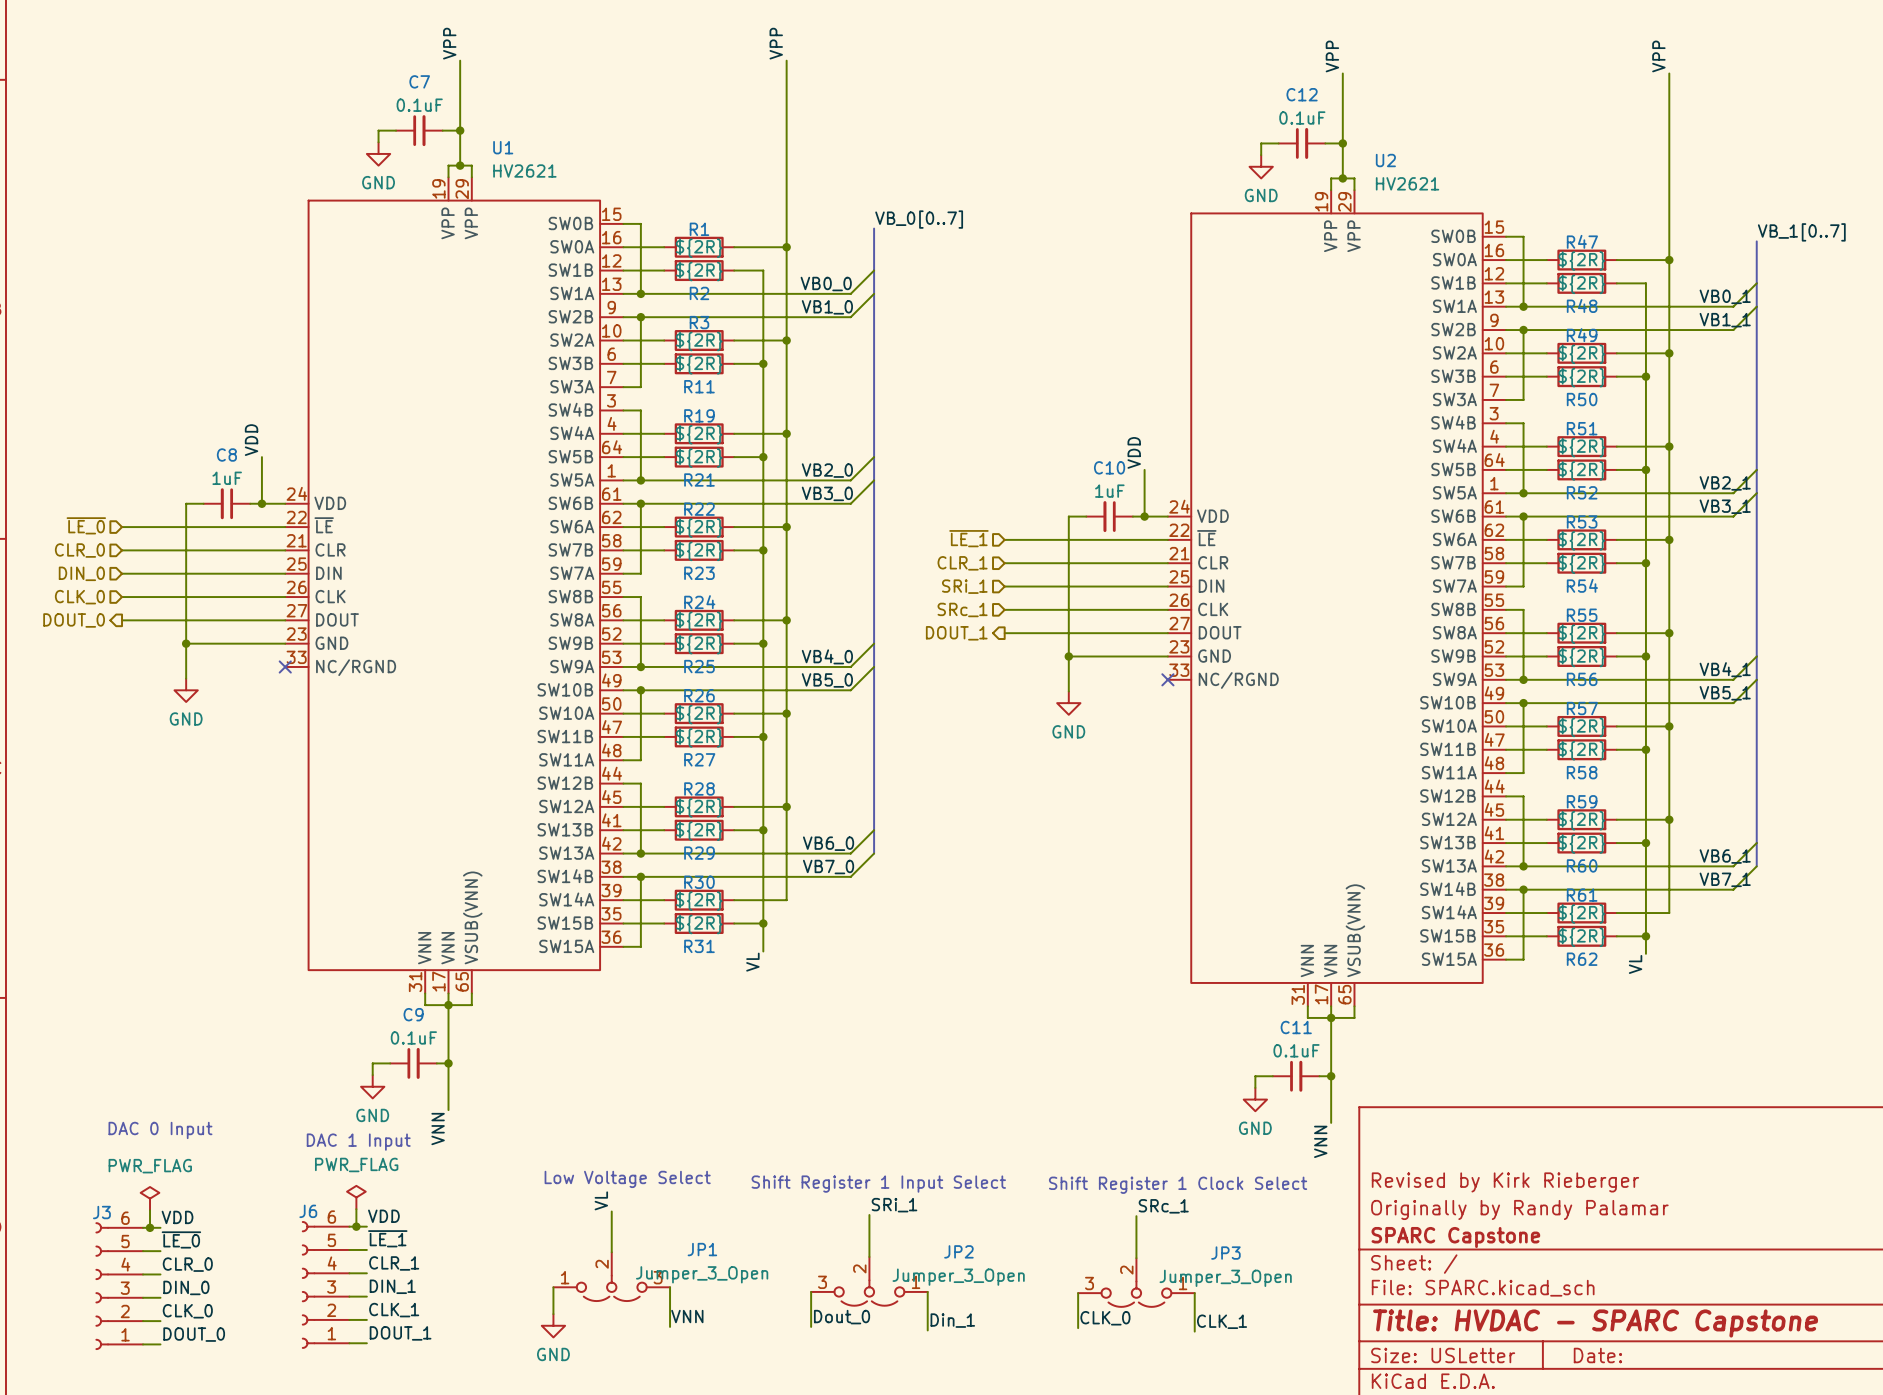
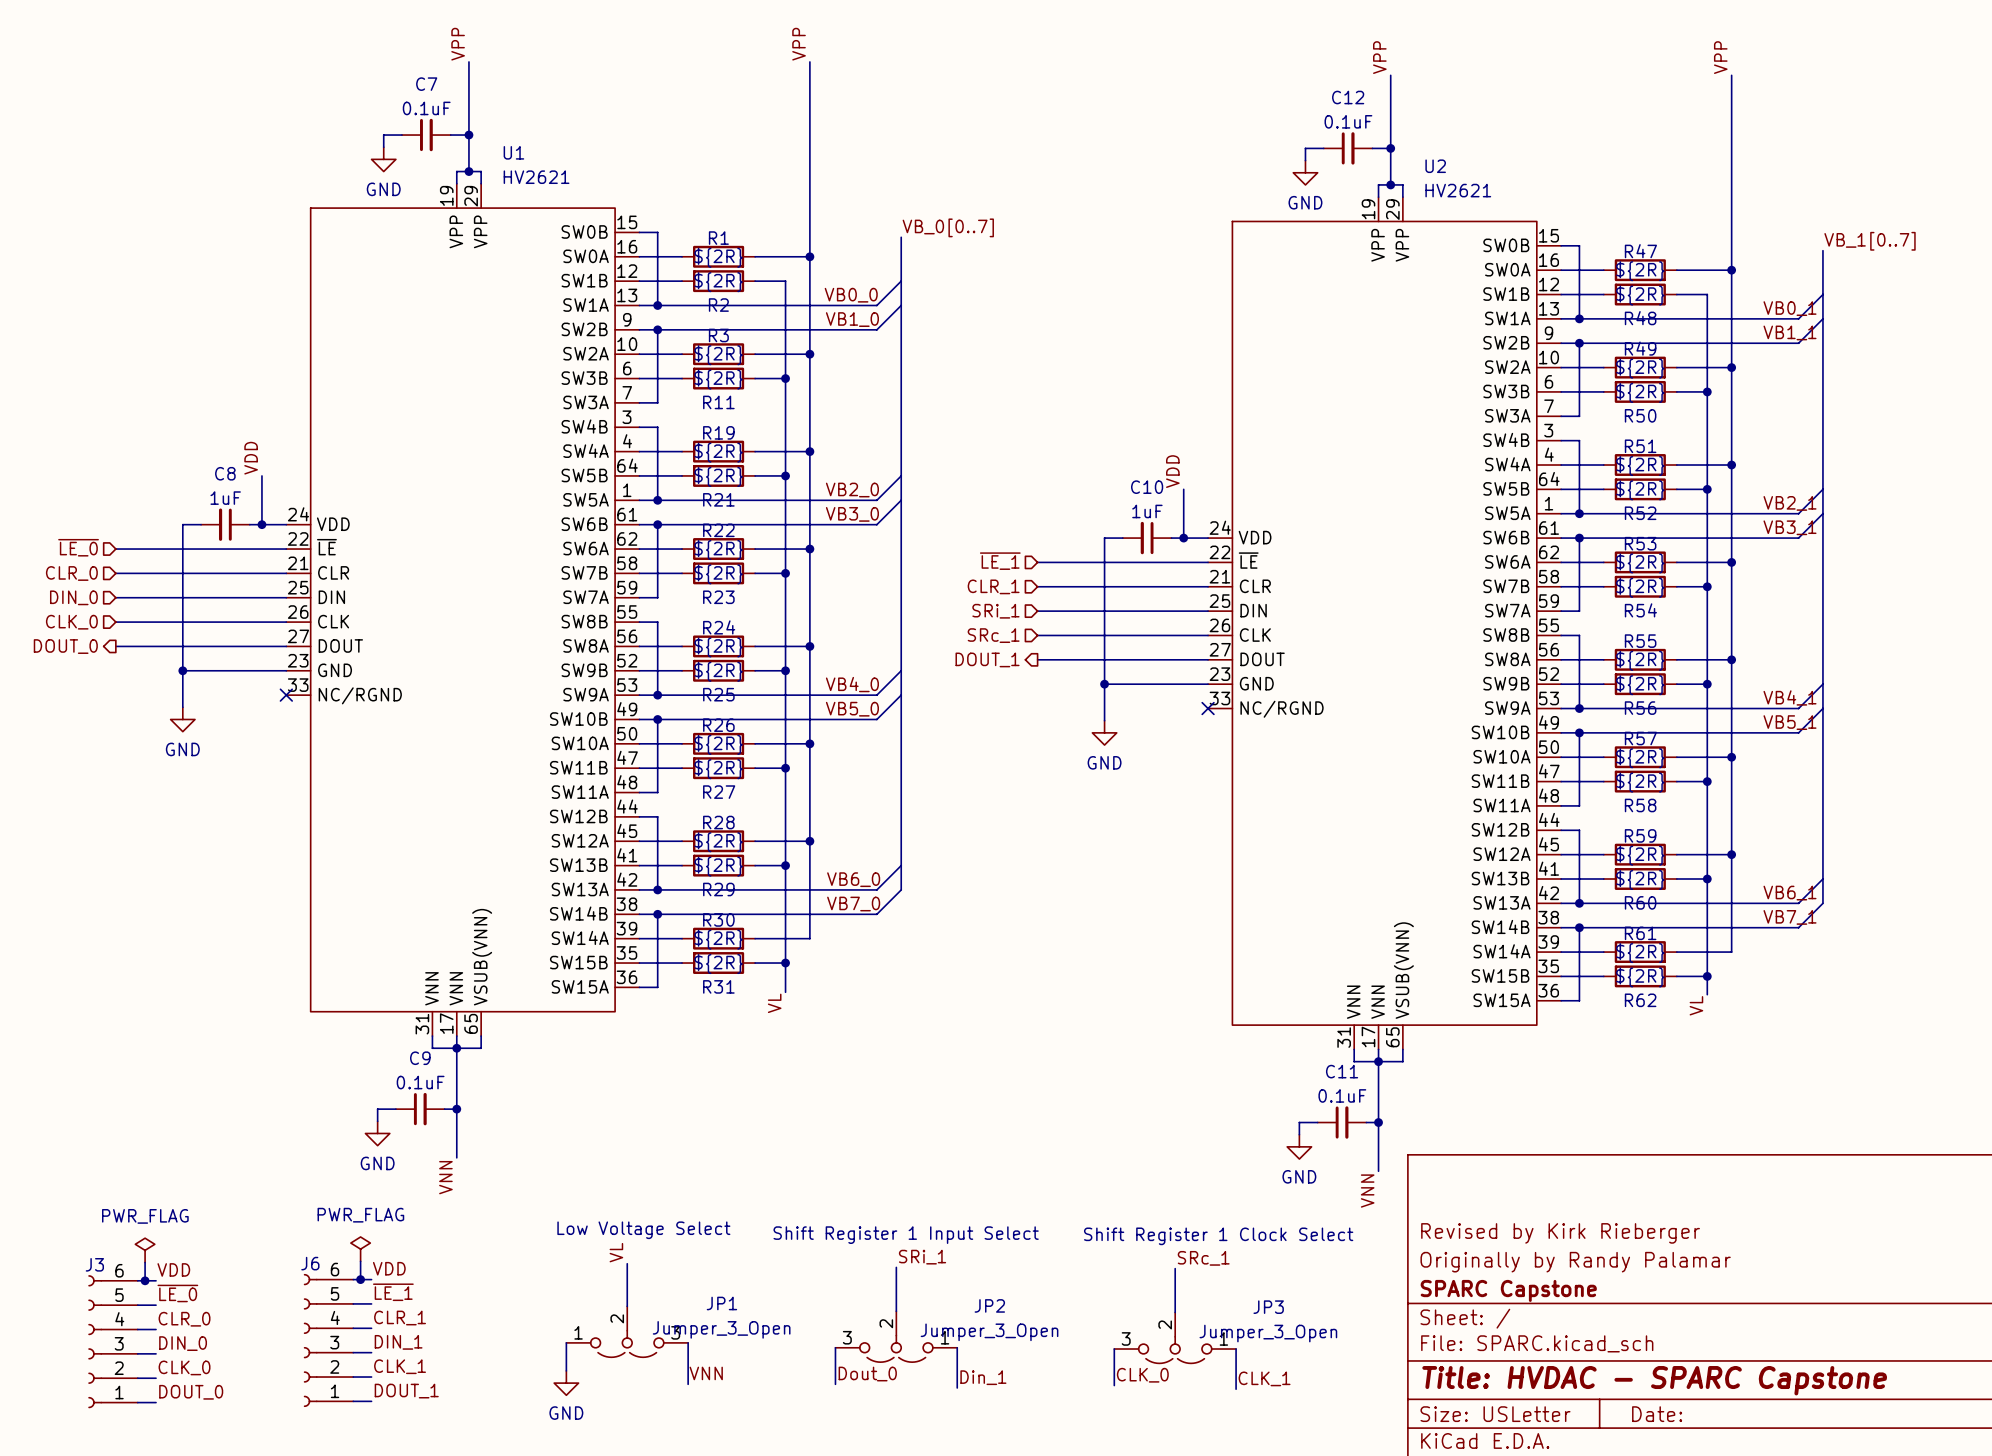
text: DAC 0 Input (160, 1130) -> none
text: DAC 1 Input (358, 1142) -> none

